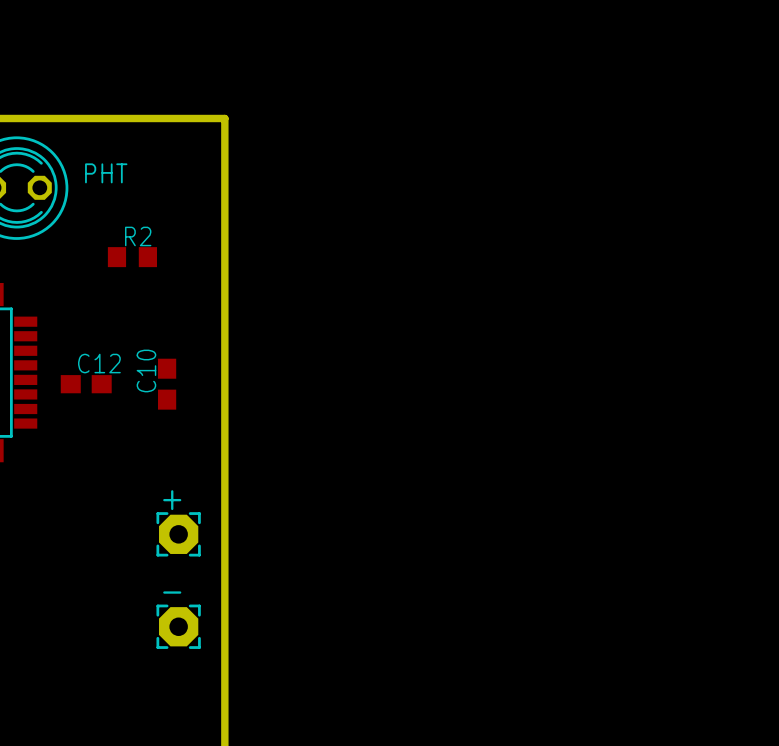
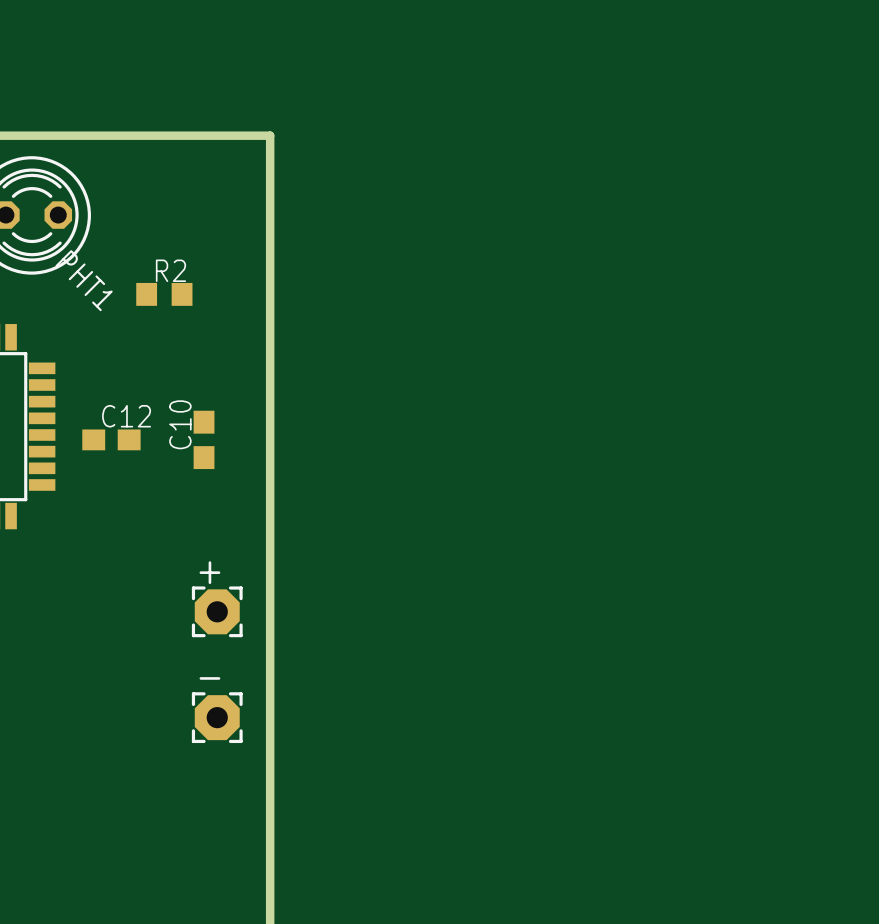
PHT name: PHT (106, 173) -> PHT1 (84, 280)

